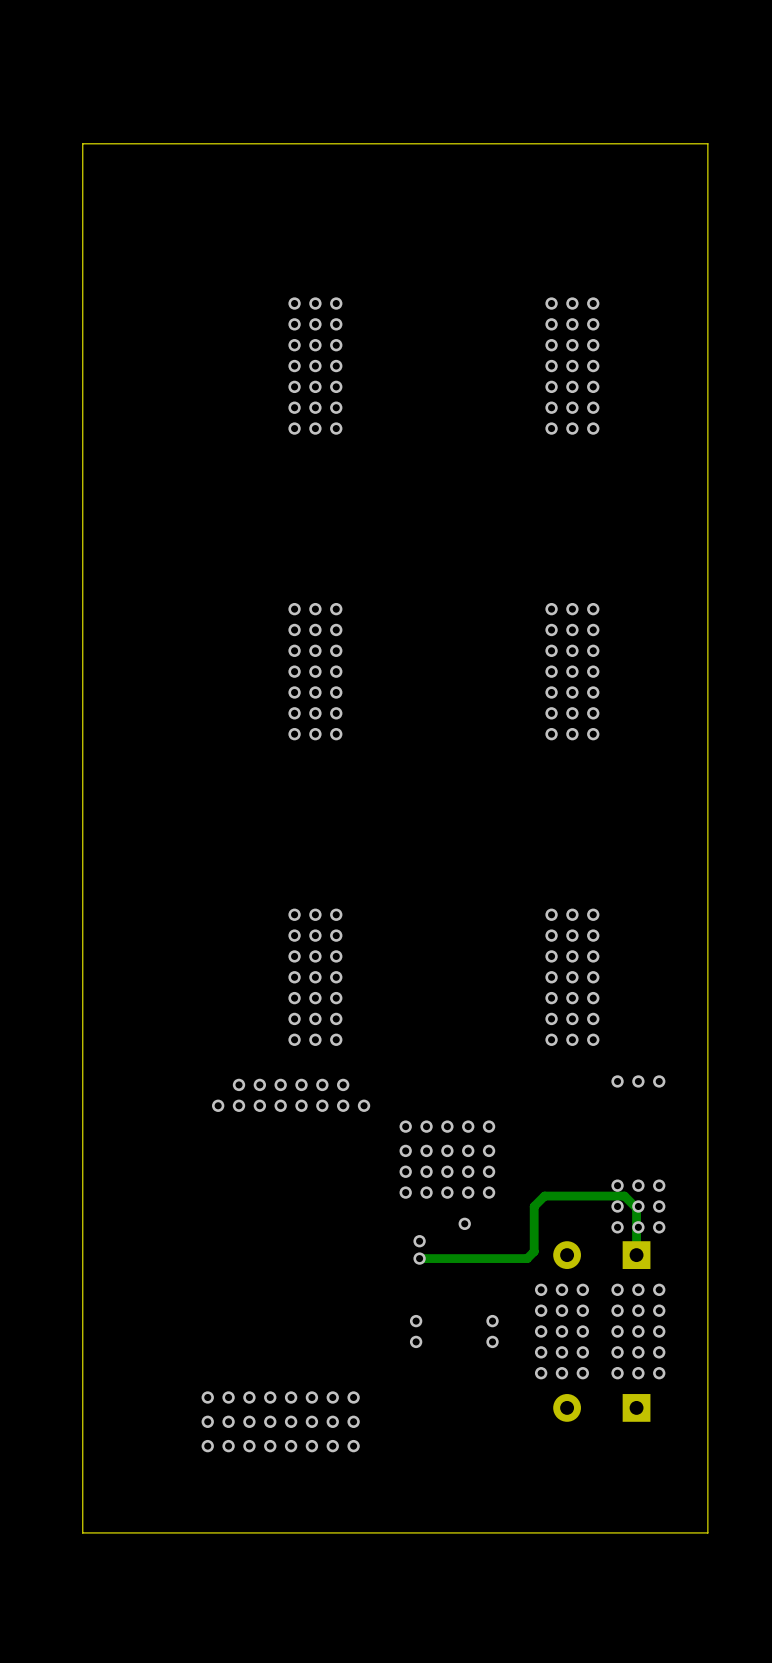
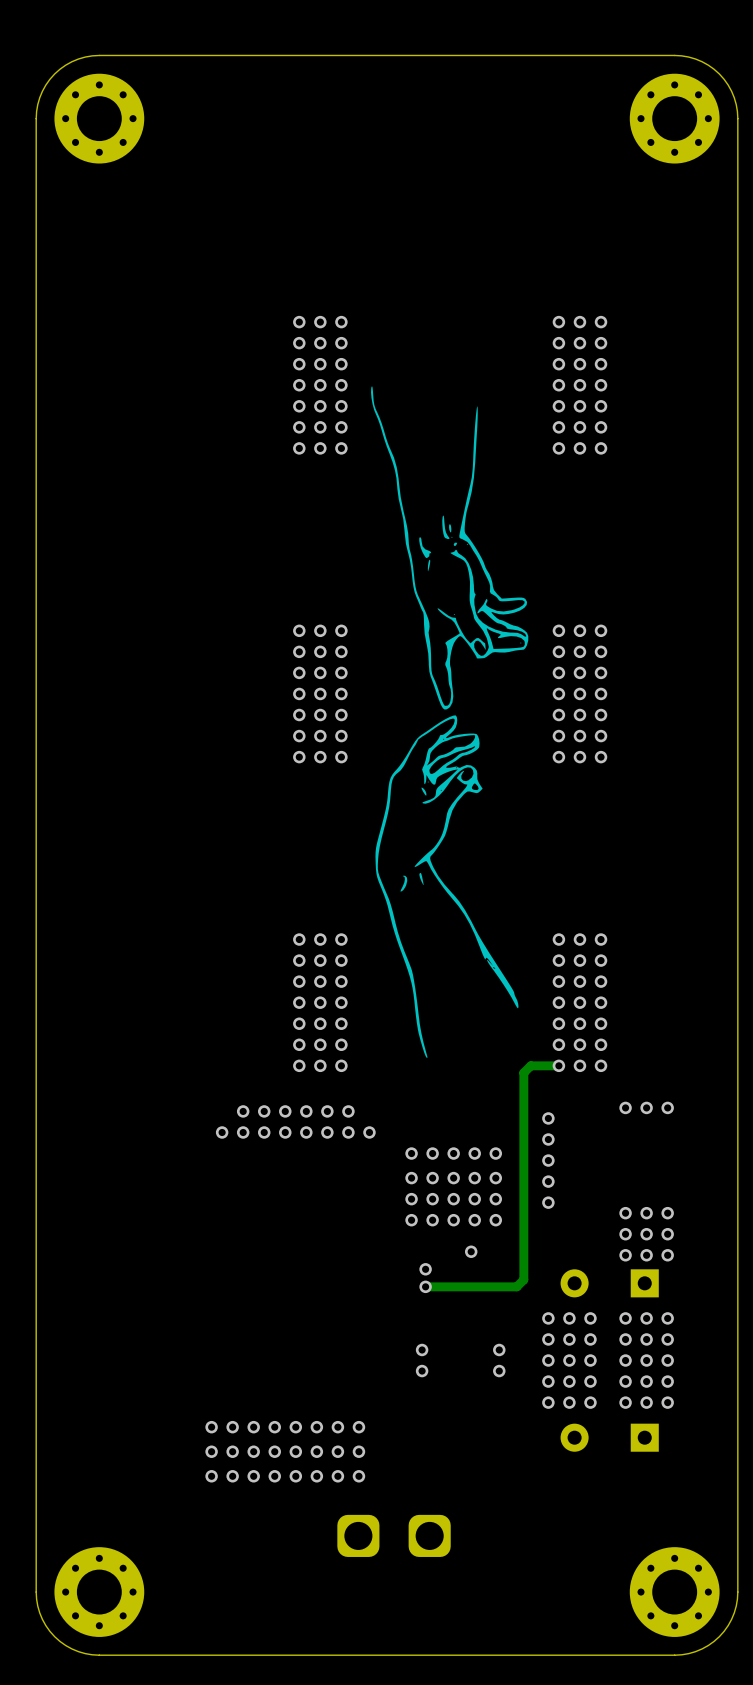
part: none -> (99, 118)
part: none -> (674, 118)
board edge: (707, 143) (82, 143) (82, 1532) (707, 1532) (707, 143) -> (674, 55) (688, 57) (702, 61) (719, 73) (731, 91) (736, 104) (737, 118) (737, 1592) (734, 1612) (728, 1625) (714, 1641) (695, 1651) (681, 1654) (99, 1655) (78, 1651) (59, 1641) (45, 1625) (37, 1606) (36, 1592) (36, 118) (39, 97) (45, 85) (59, 69) (71, 61) (92, 55) (674, 55)
drawing: none -> [371, 386, 529, 1058]
via: none -> (548, 1118)
via: none -> (548, 1139)
via: none -> (548, 1160)
via: none -> (548, 1181)
via: none -> (548, 1202)
track: (636, 1255) (636, 1208) (624, 1196) (544, 1196) (534, 1206) (534, 1251) (527, 1258) (509, 1258) -> (558, 1065) (530, 1065) (523, 1072) (523, 1279) (516, 1286)
part: none -> (394, 1535)
part: none -> (99, 1592)
part: none -> (674, 1592)

